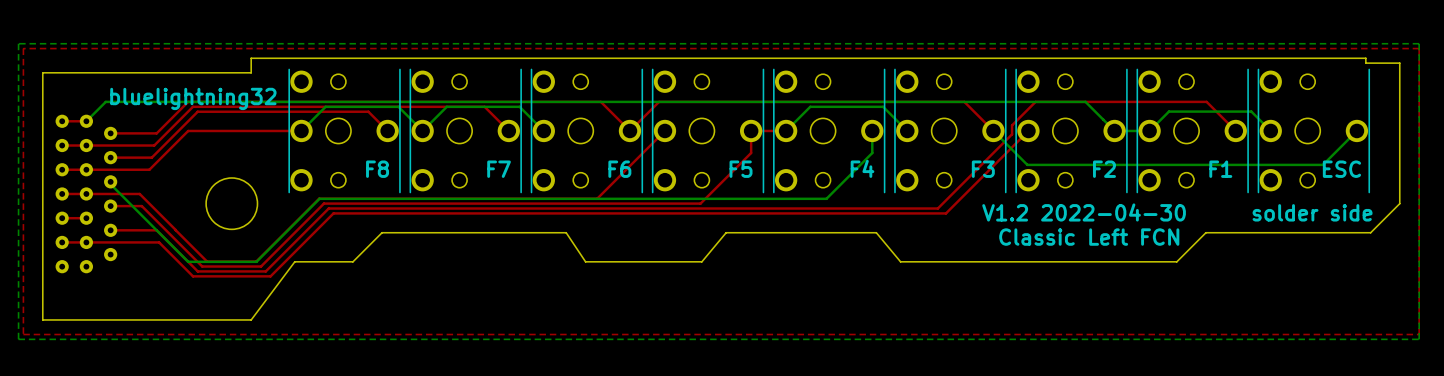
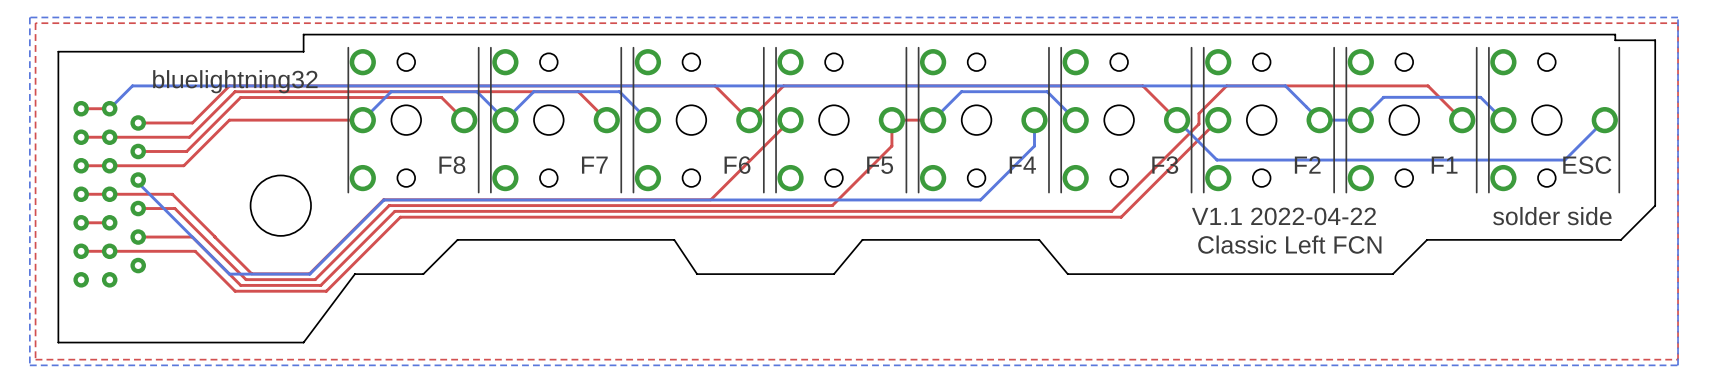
text: V1.2 2022-04-30 (1084, 212) -> V1.1 2022-04-22 (1283, 216)

